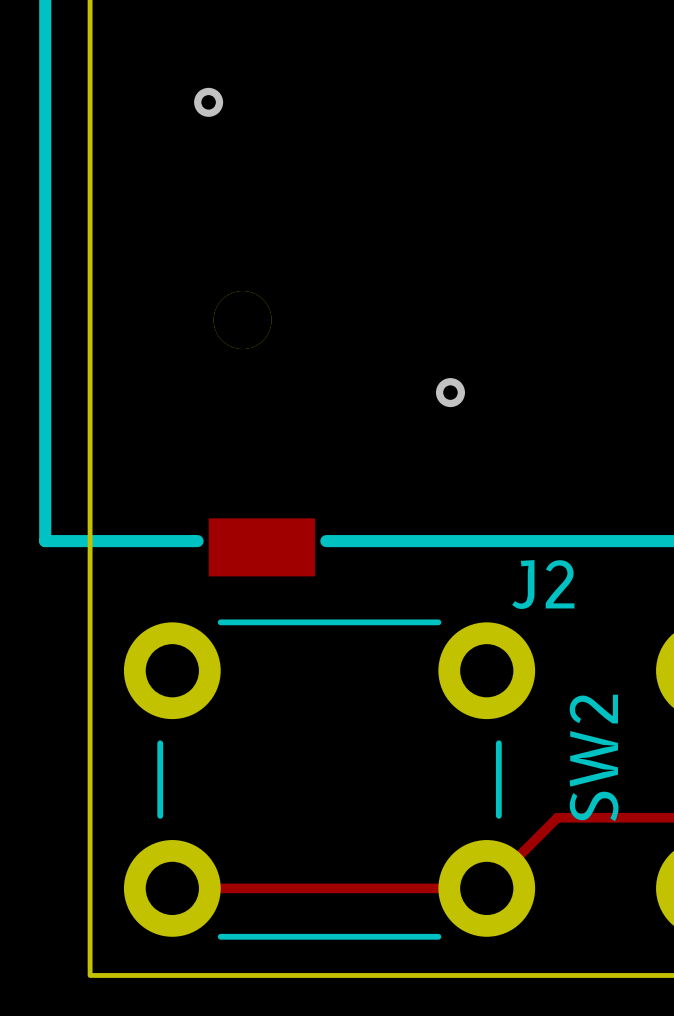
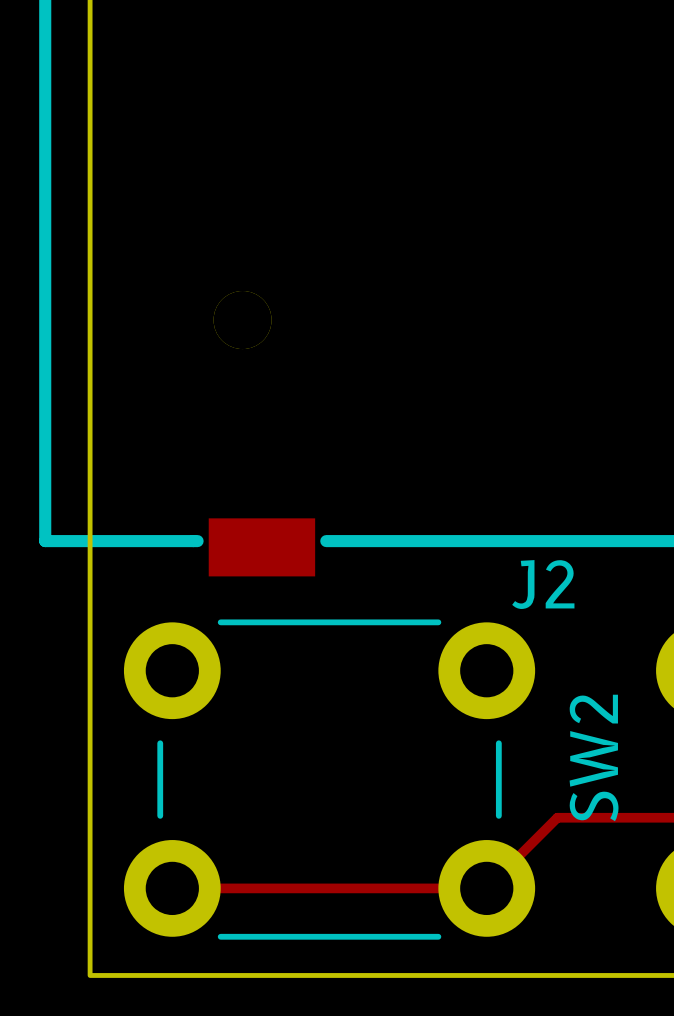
via: (208, 102) -> none
via: (450, 392) -> none

